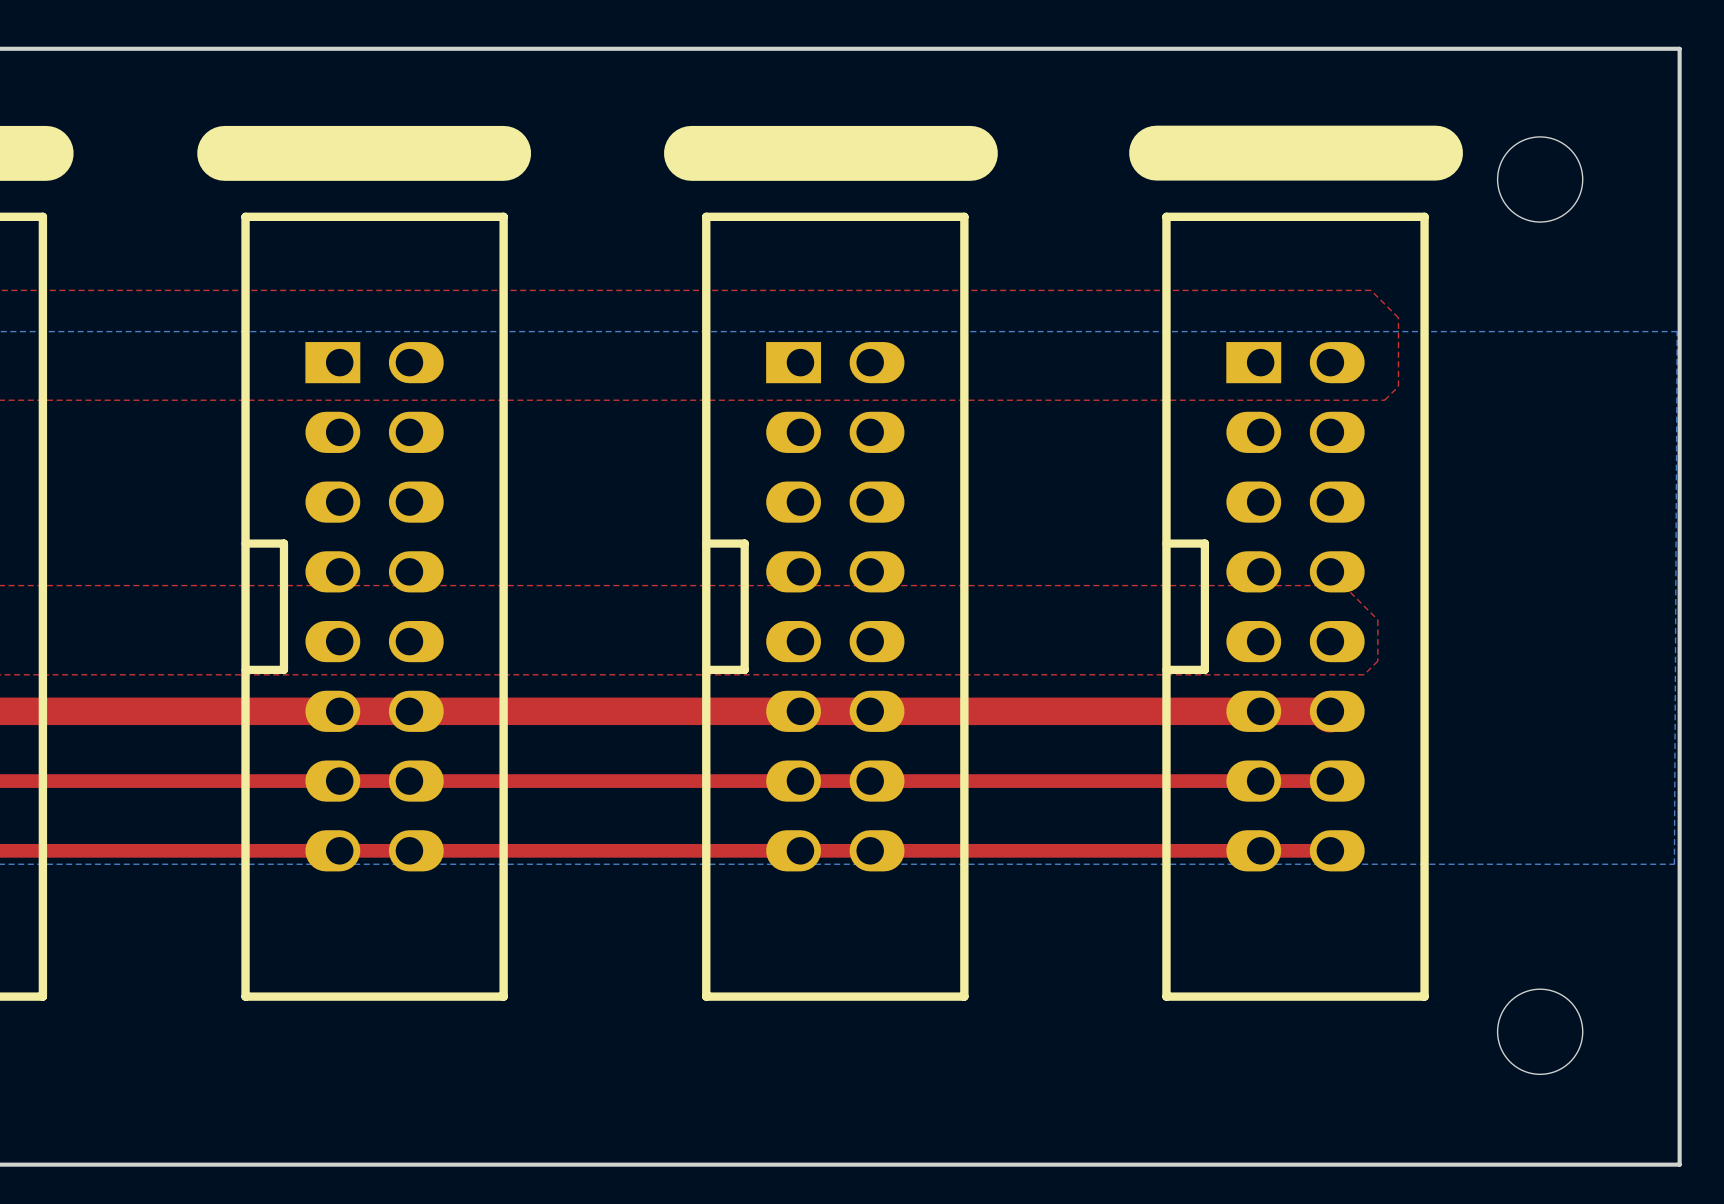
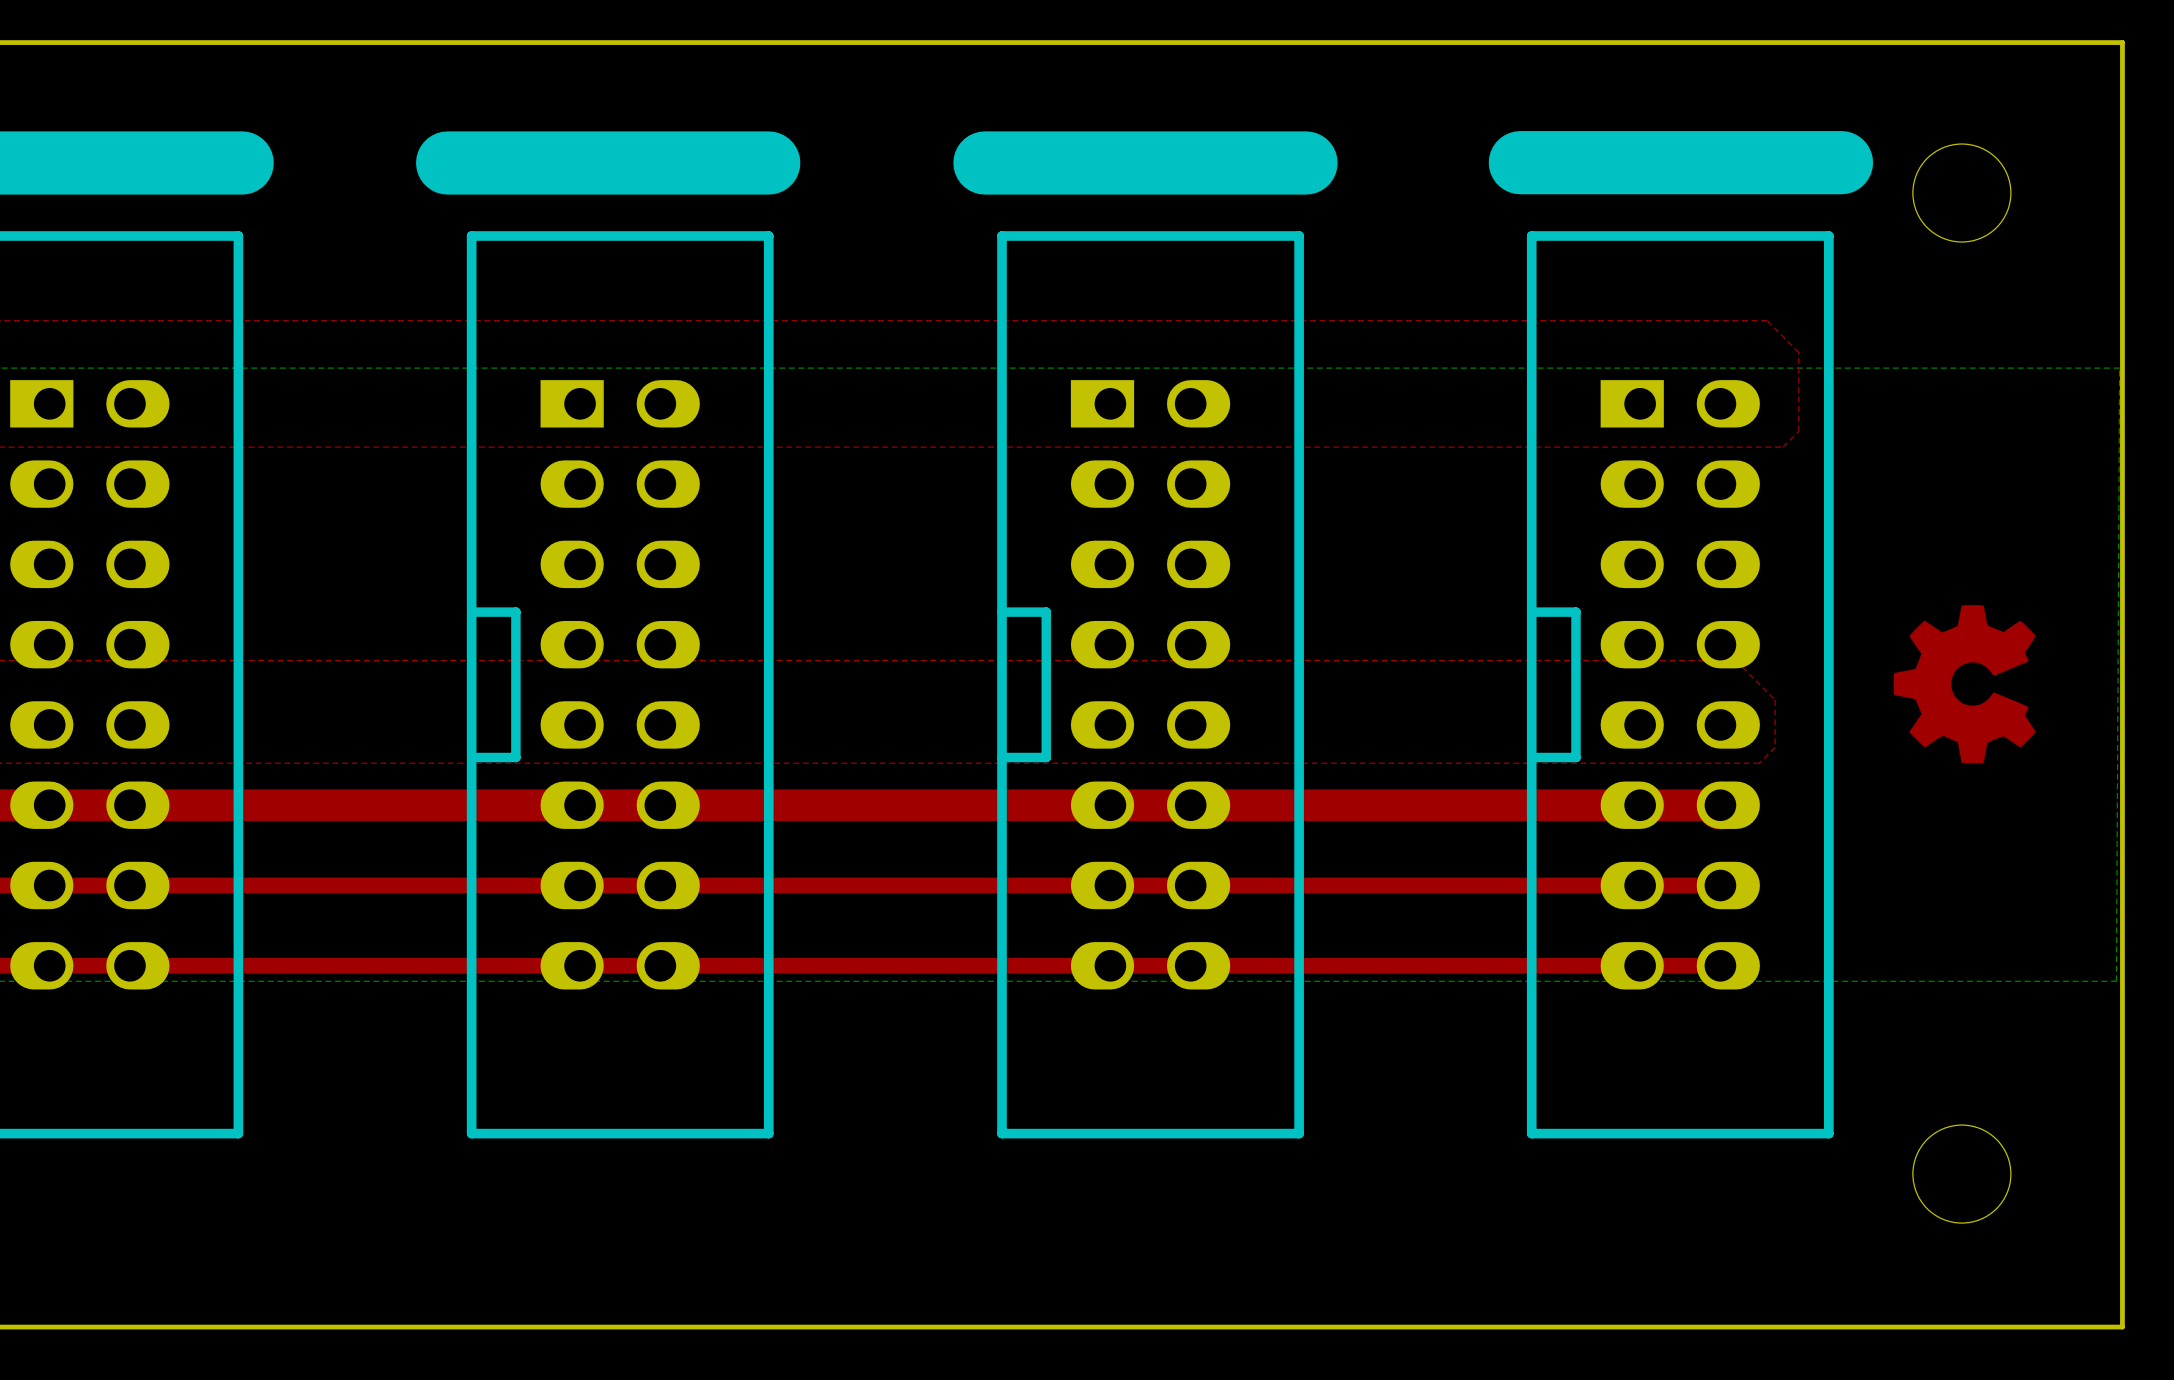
drawing: none -> [1893, 605, 2036, 764]

